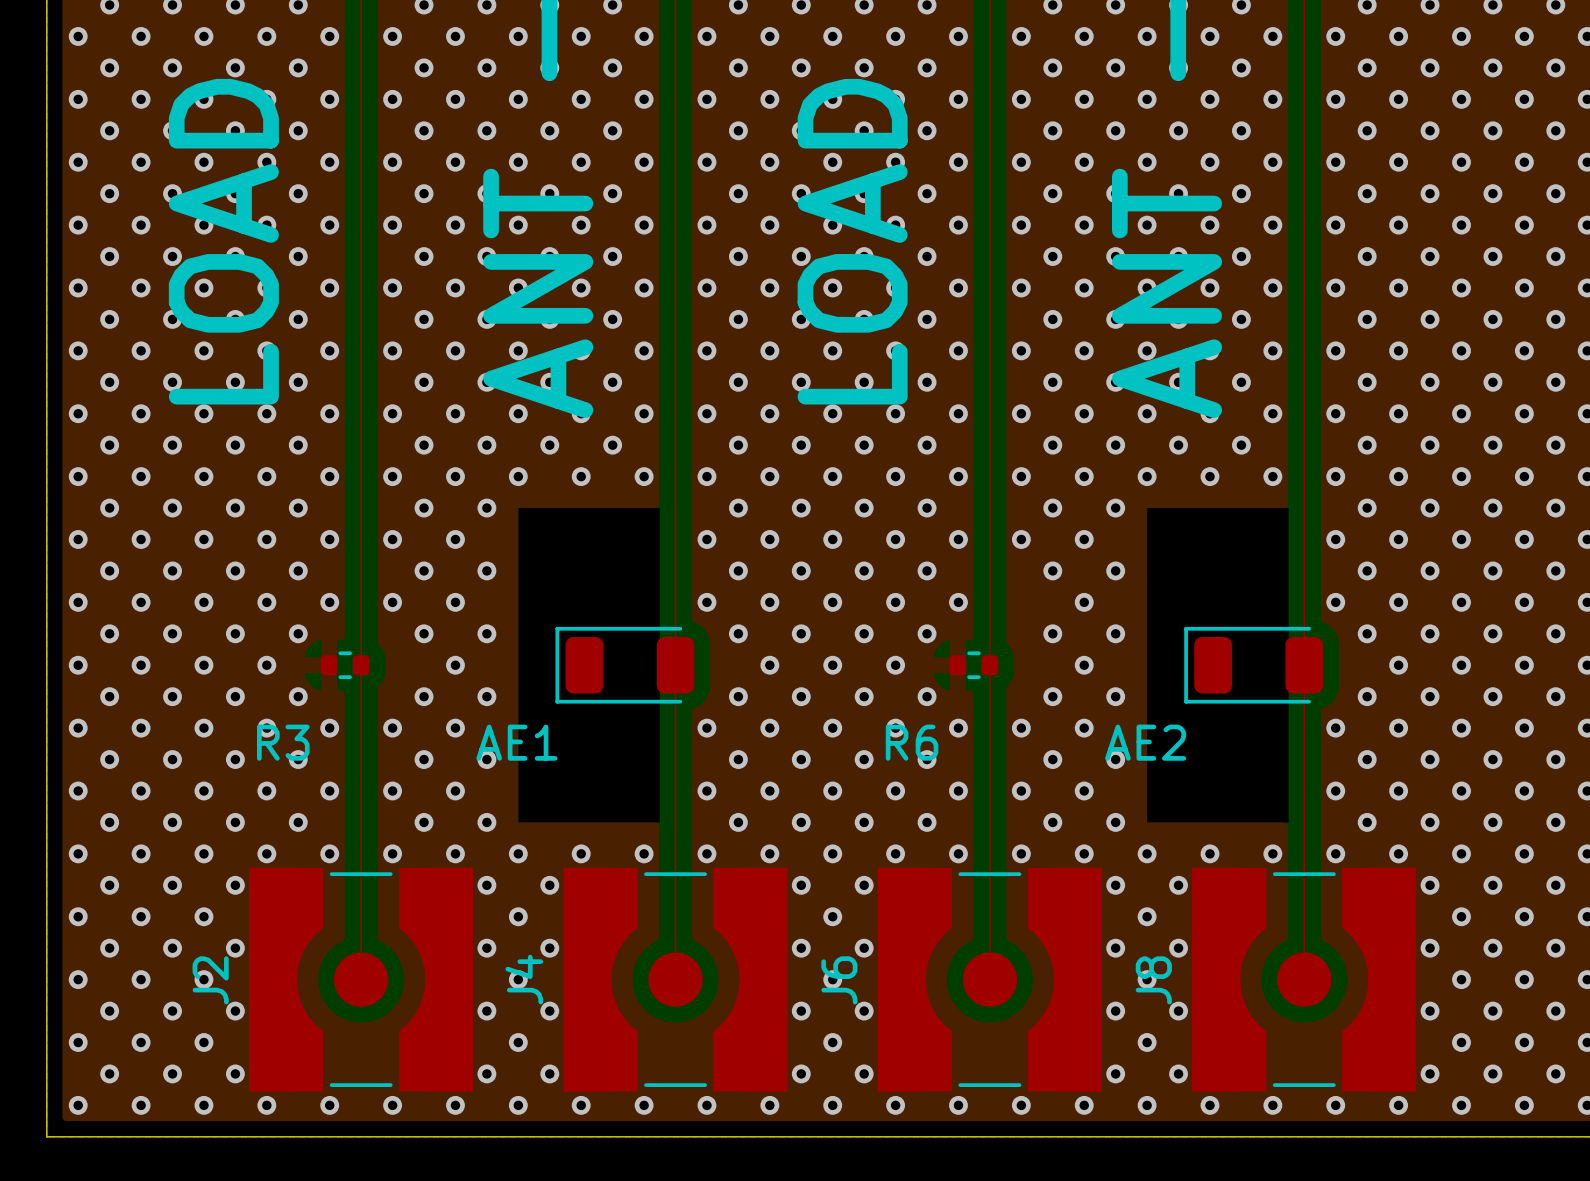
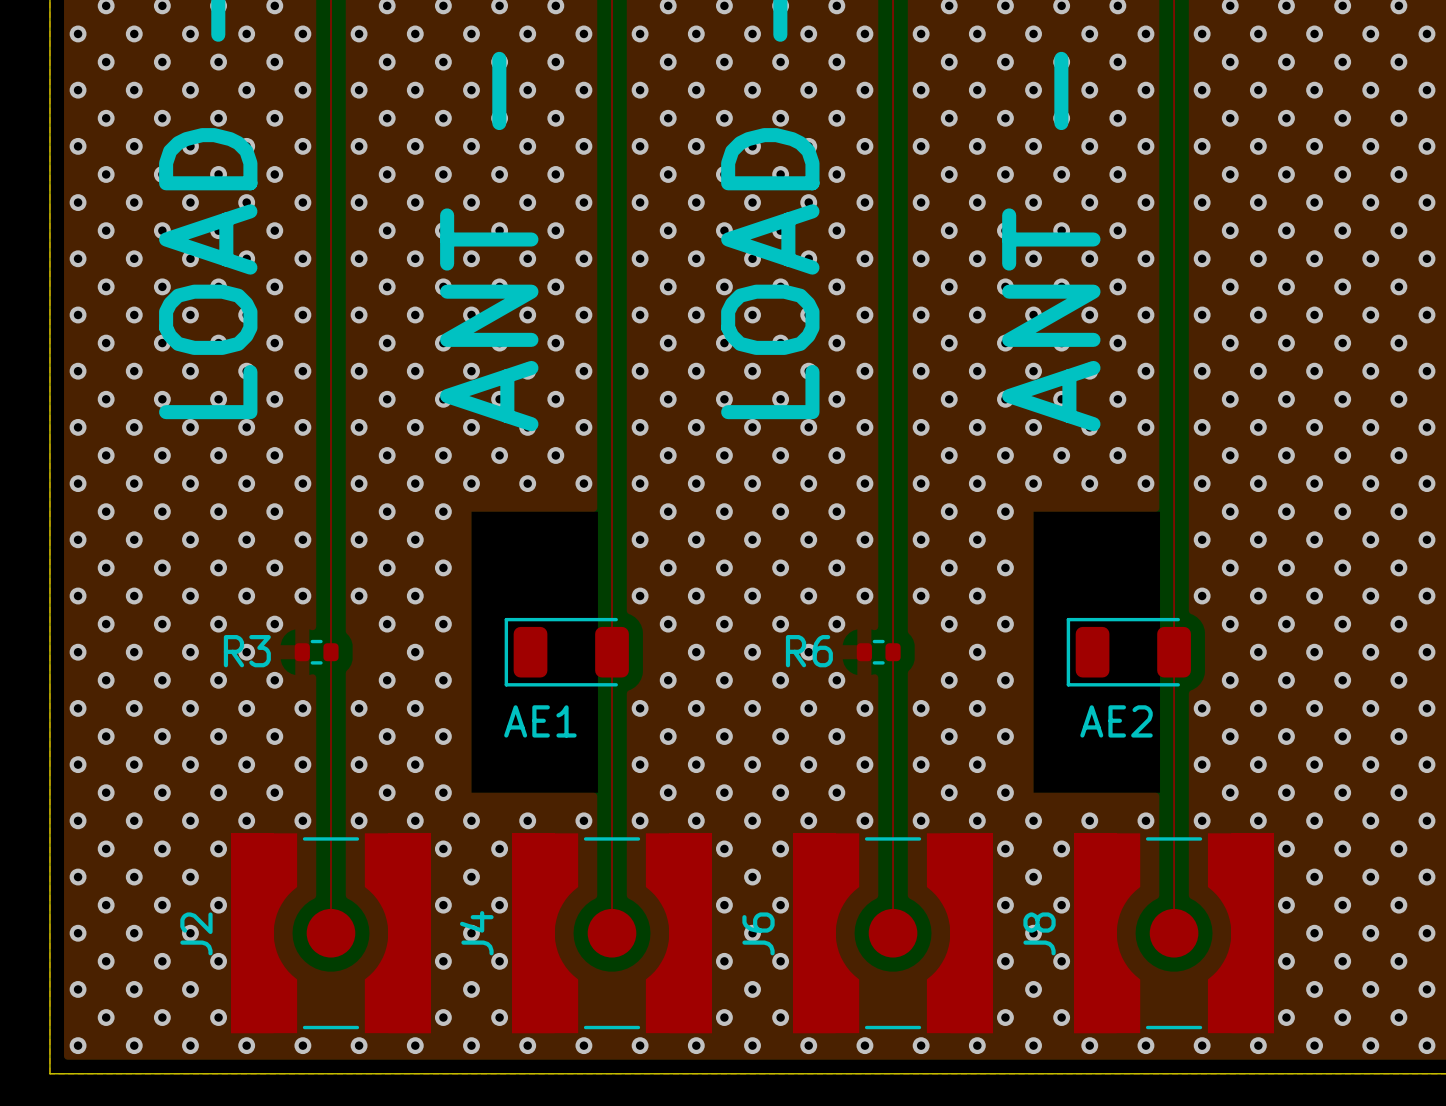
via: none -> (921, 596)
R3 name position: R3 (283, 742) -> R3 (247, 651)
AE1 name position: AE1 (516, 742) -> AE1 (540, 721)
R6 name position: R6 (912, 742) -> R6 (809, 651)
AE2 name position: AE2 (1145, 742) -> AE2 (1116, 721)

